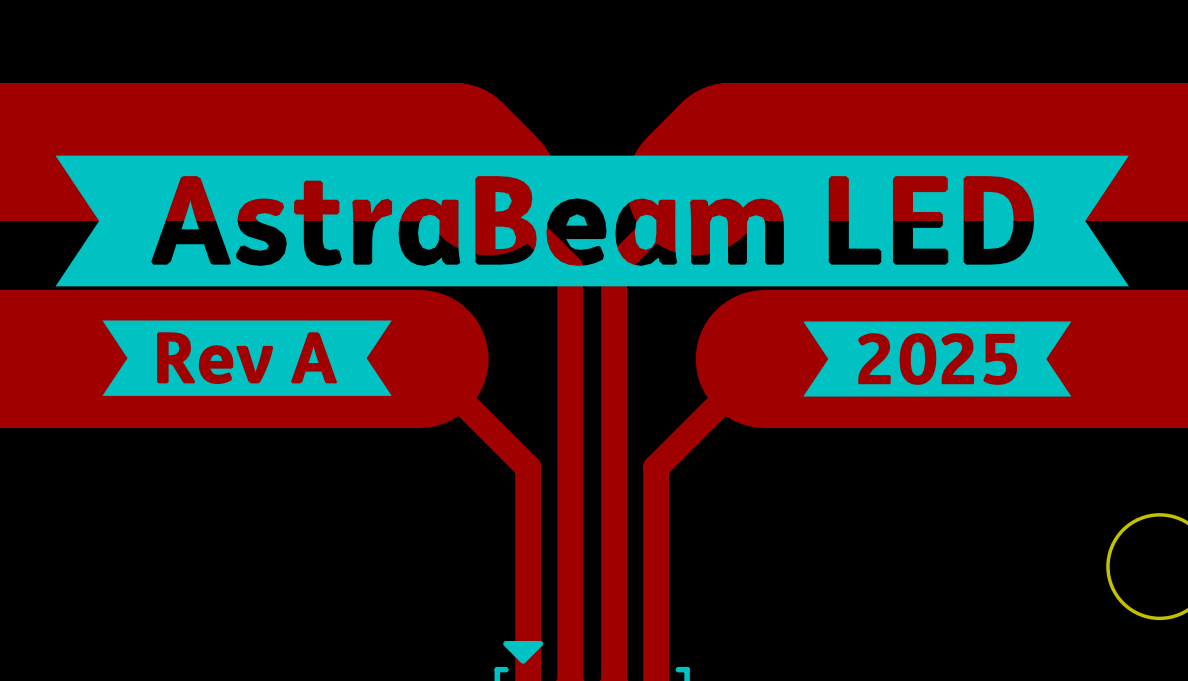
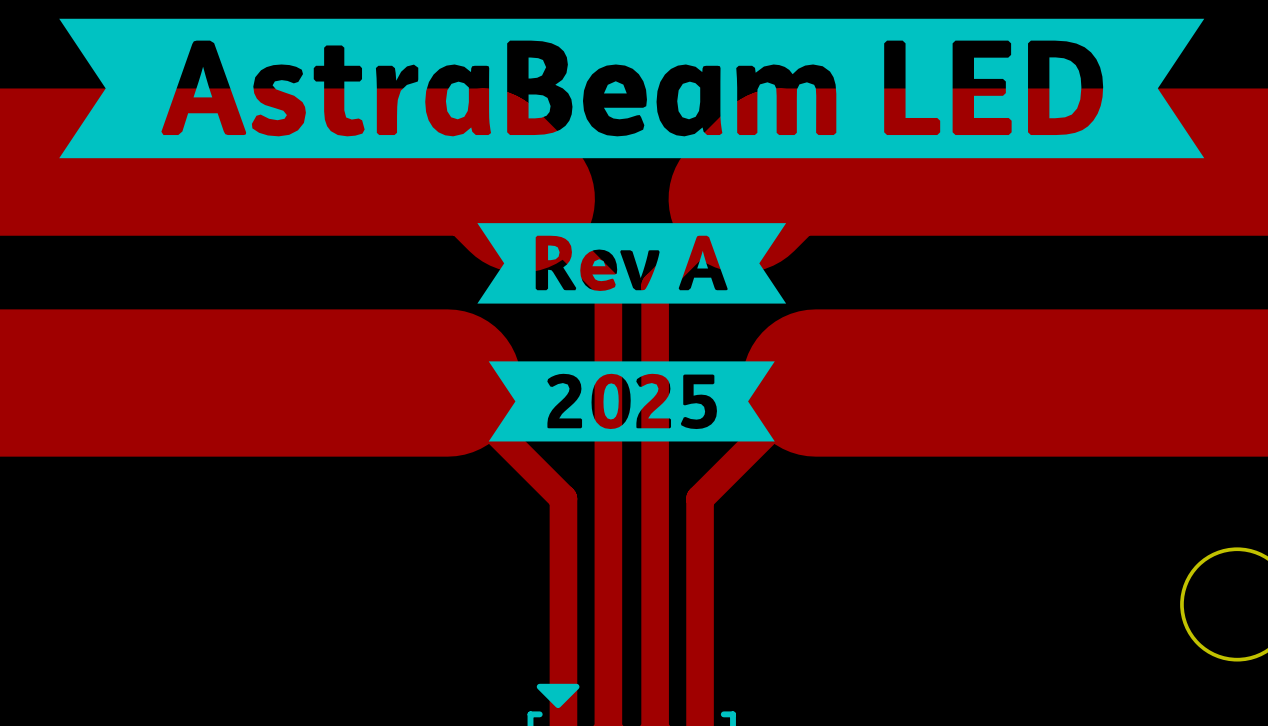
drawing position: (592, 220) -> (631, 88)
drawing position: (247, 358) -> (631, 263)
drawing position: (937, 359) -> (631, 401)

